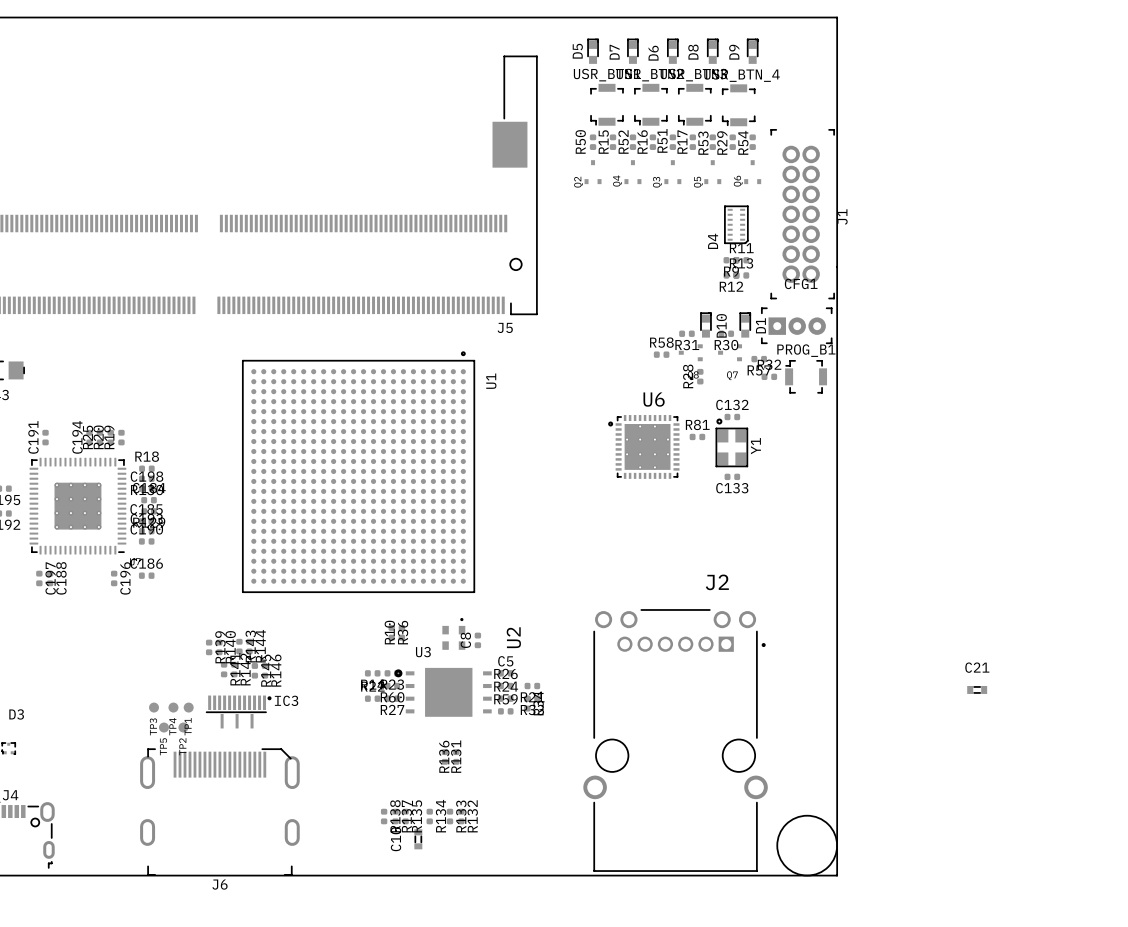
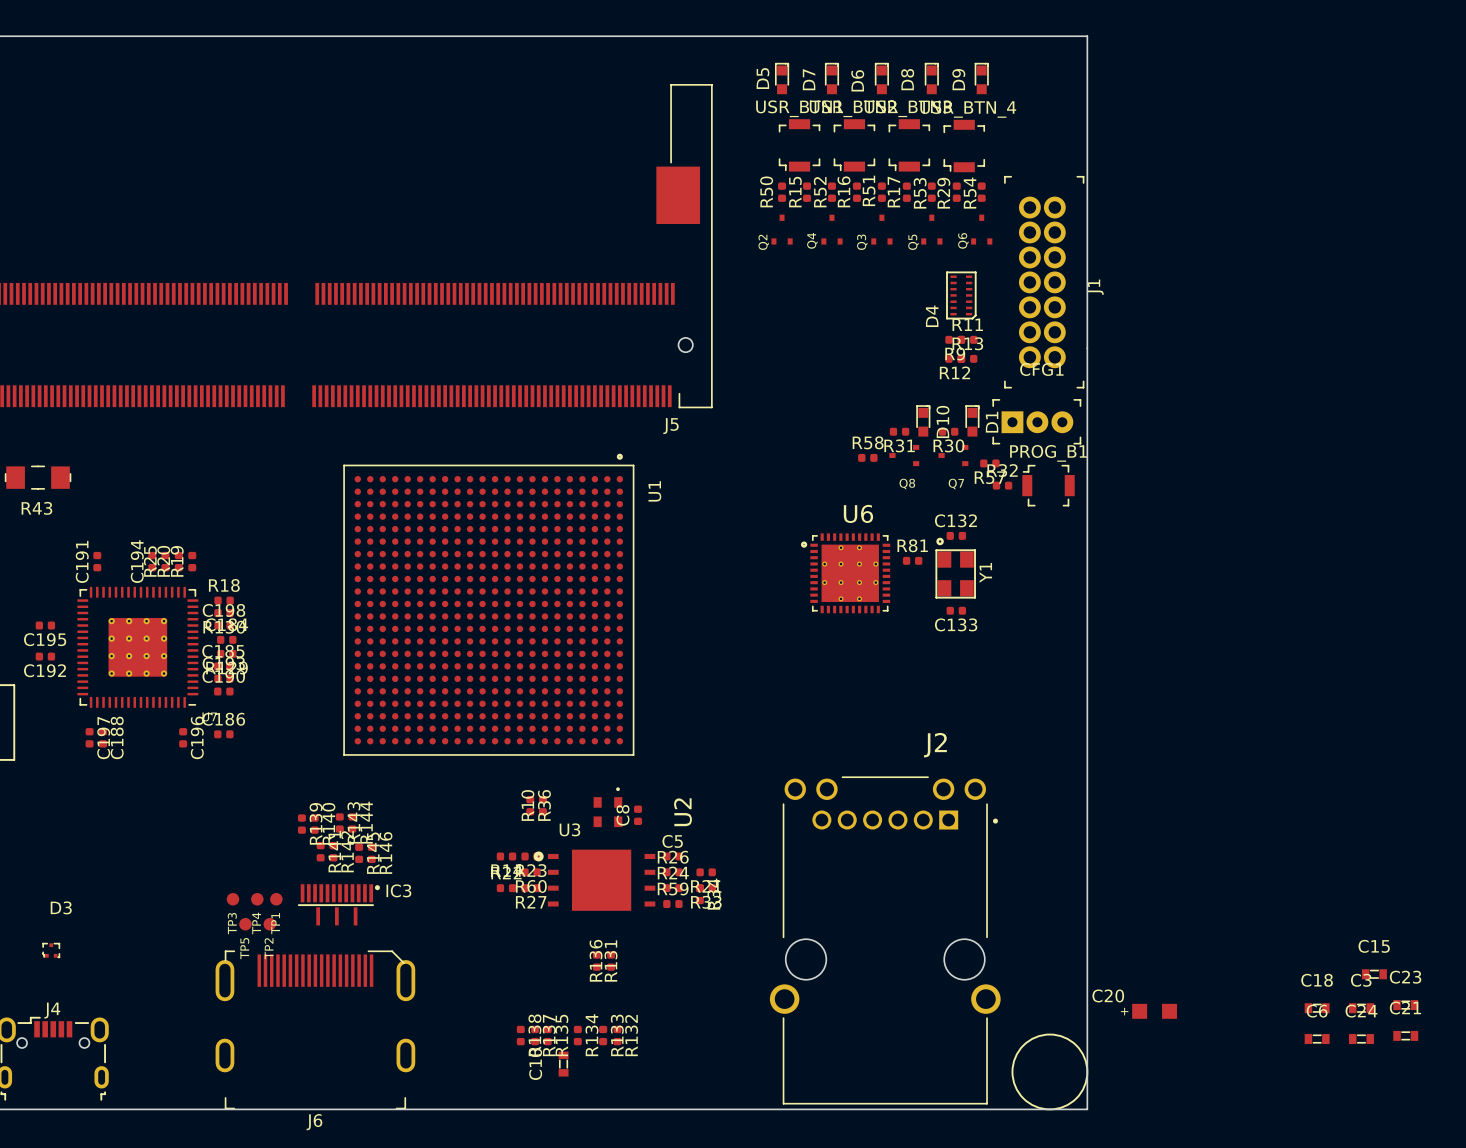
R28: (700, 376) -> none
C21 position: (977, 689) -> (1405, 1035)
C15: none -> (1374, 974)
C23: none -> (1405, 1005)
C18: none -> (1317, 1008)
C3: none -> (1361, 1008)
C20: none -> (1154, 1011)
C6: none -> (1317, 1039)
C24: none -> (1361, 1039)

